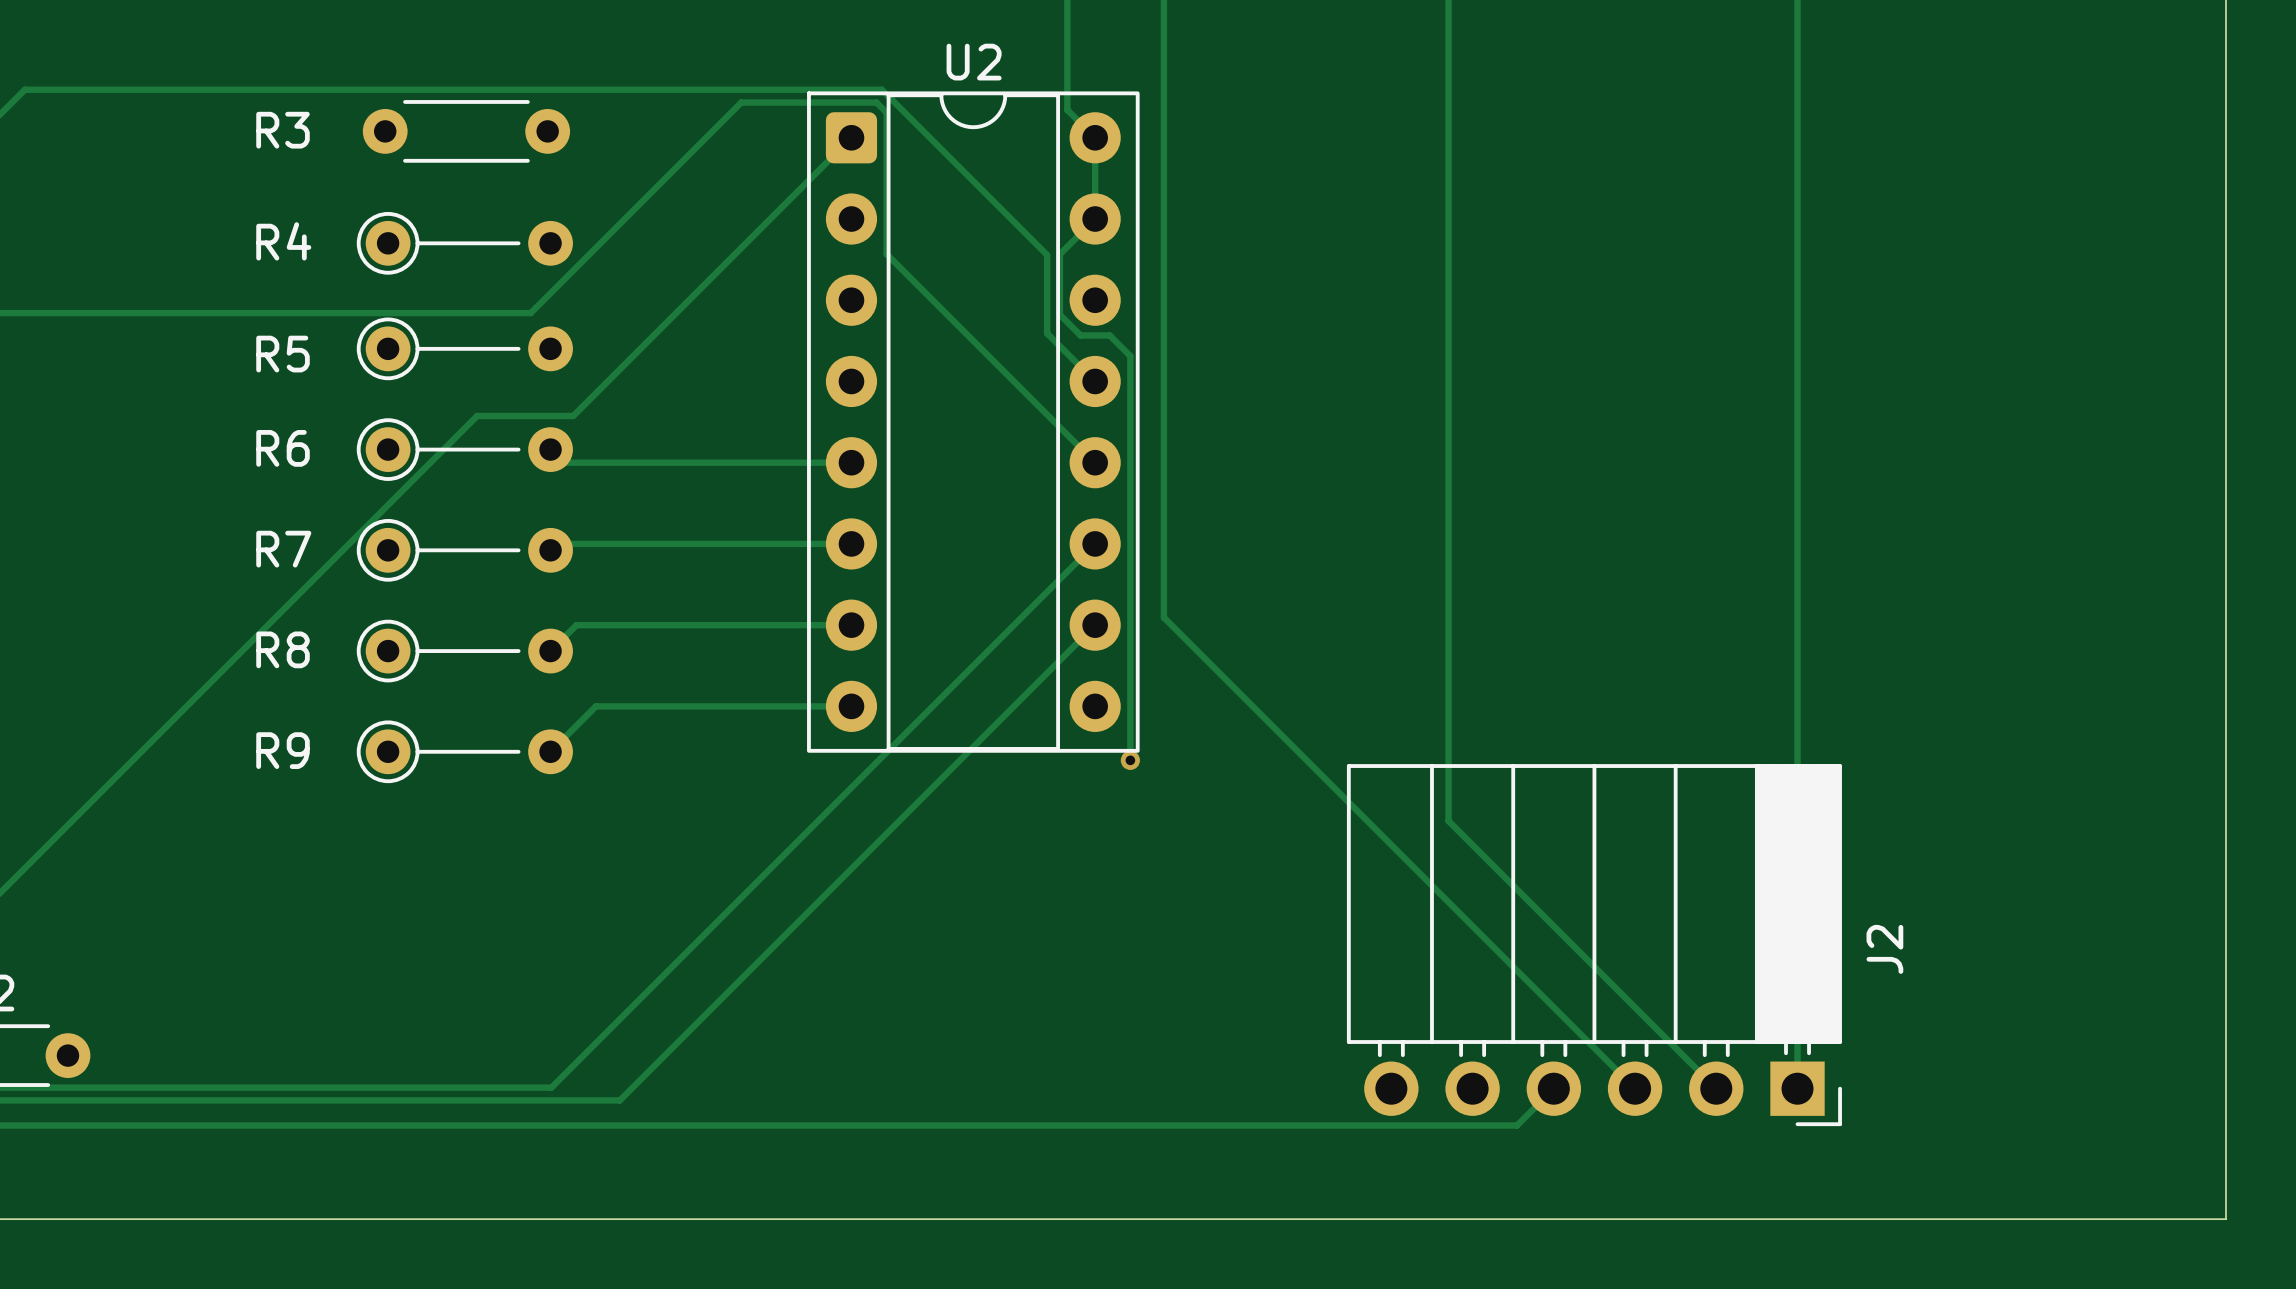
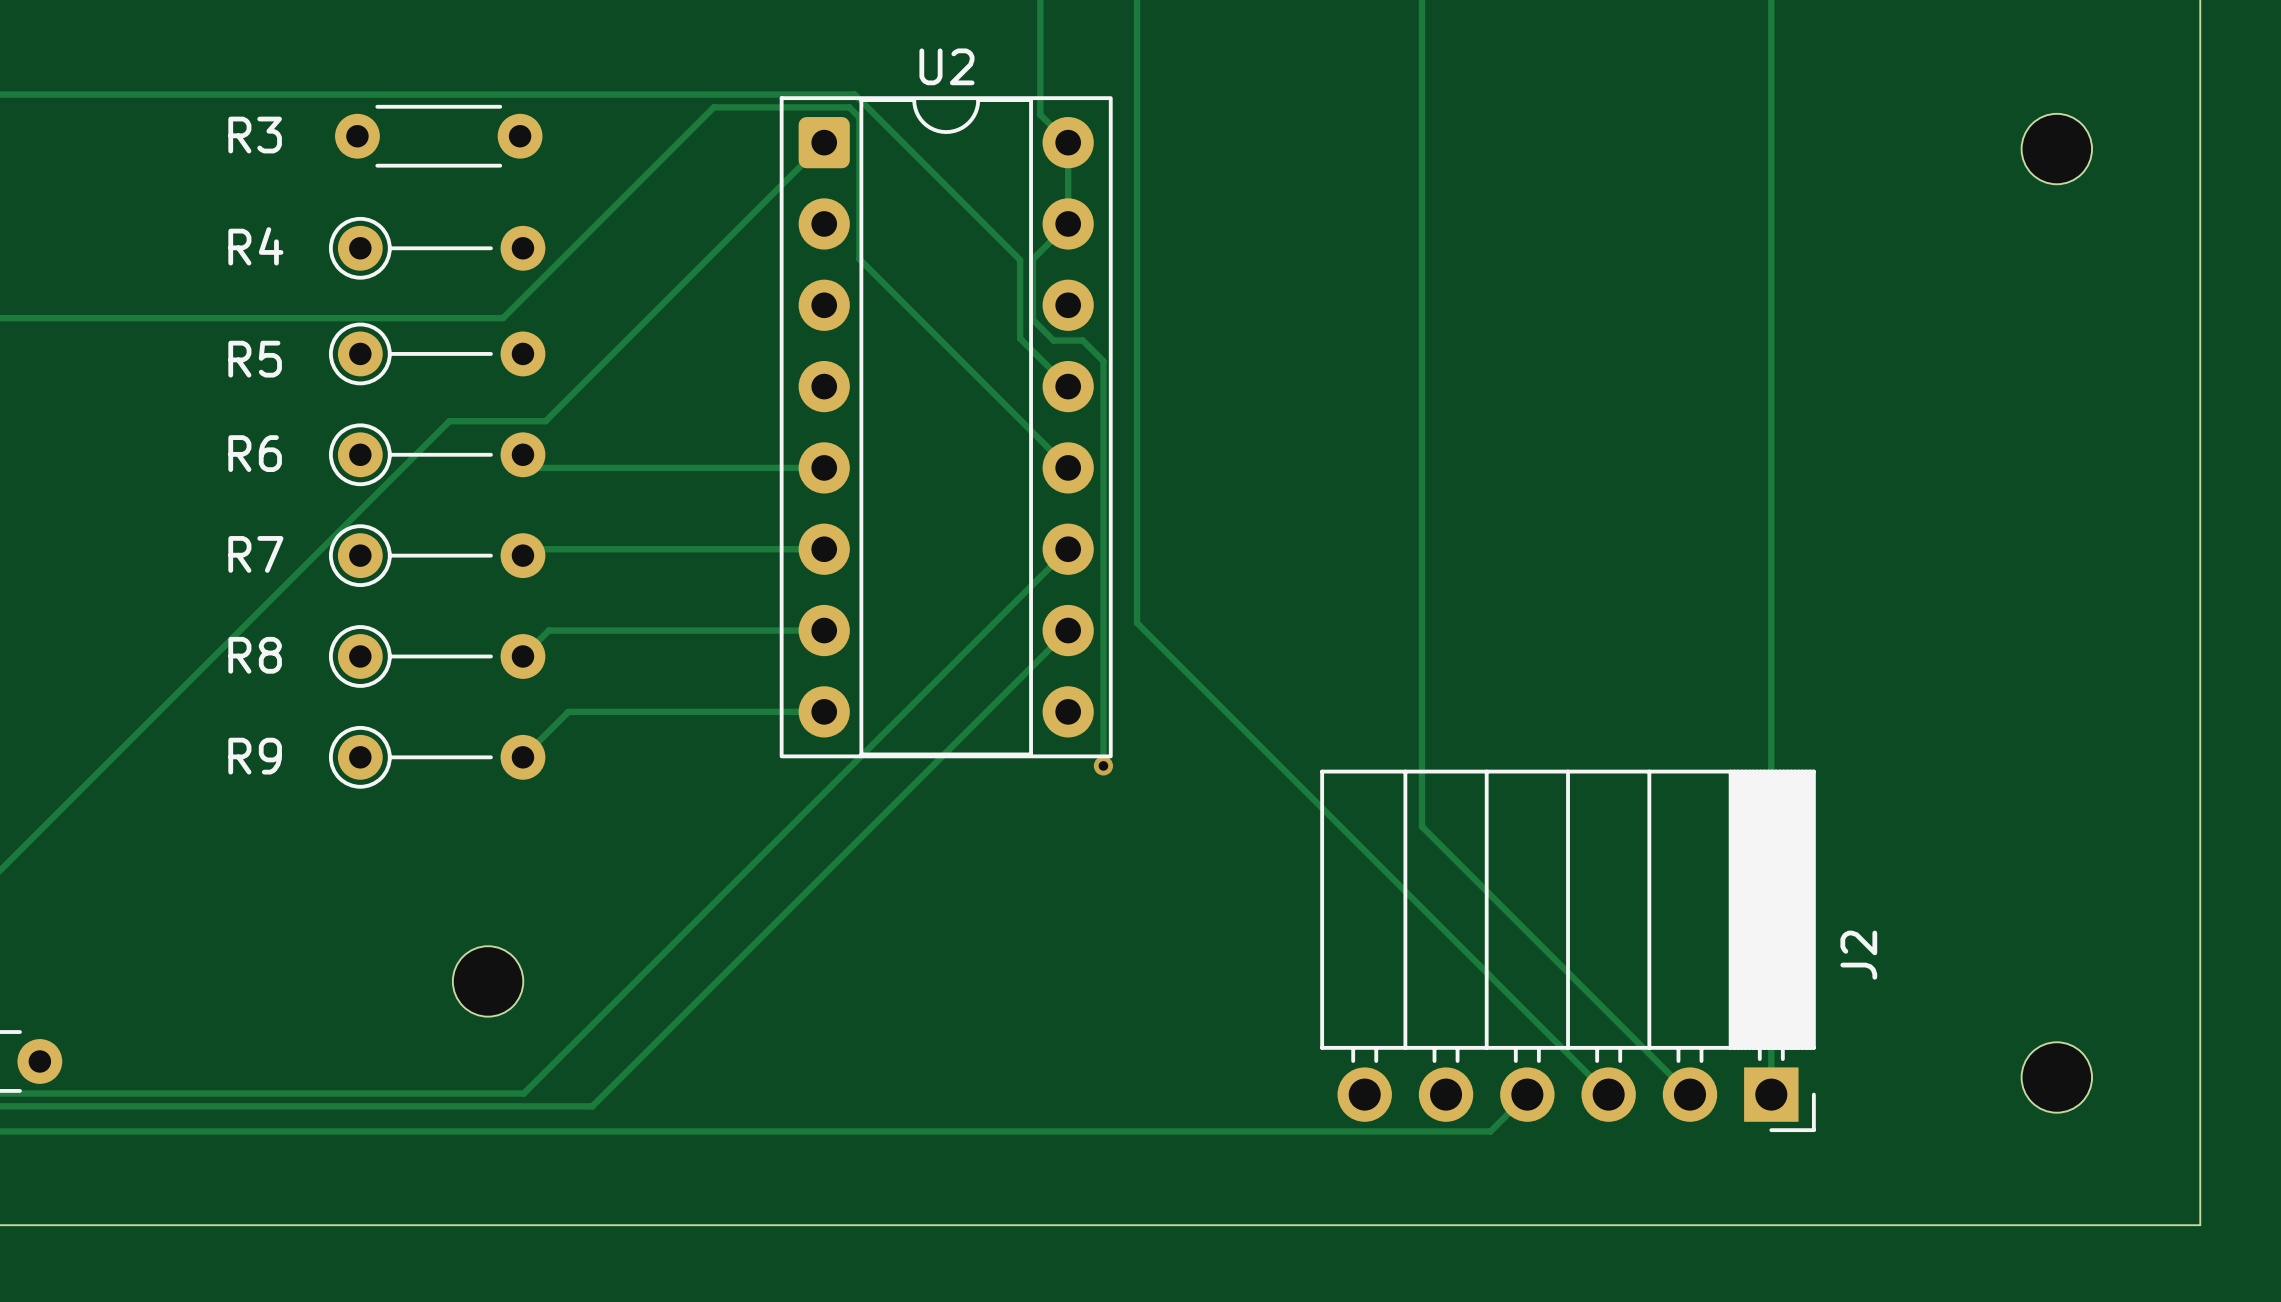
part: none -> (2056, 149)
part: none -> (488, 981)
part: none -> (2056, 1077)

